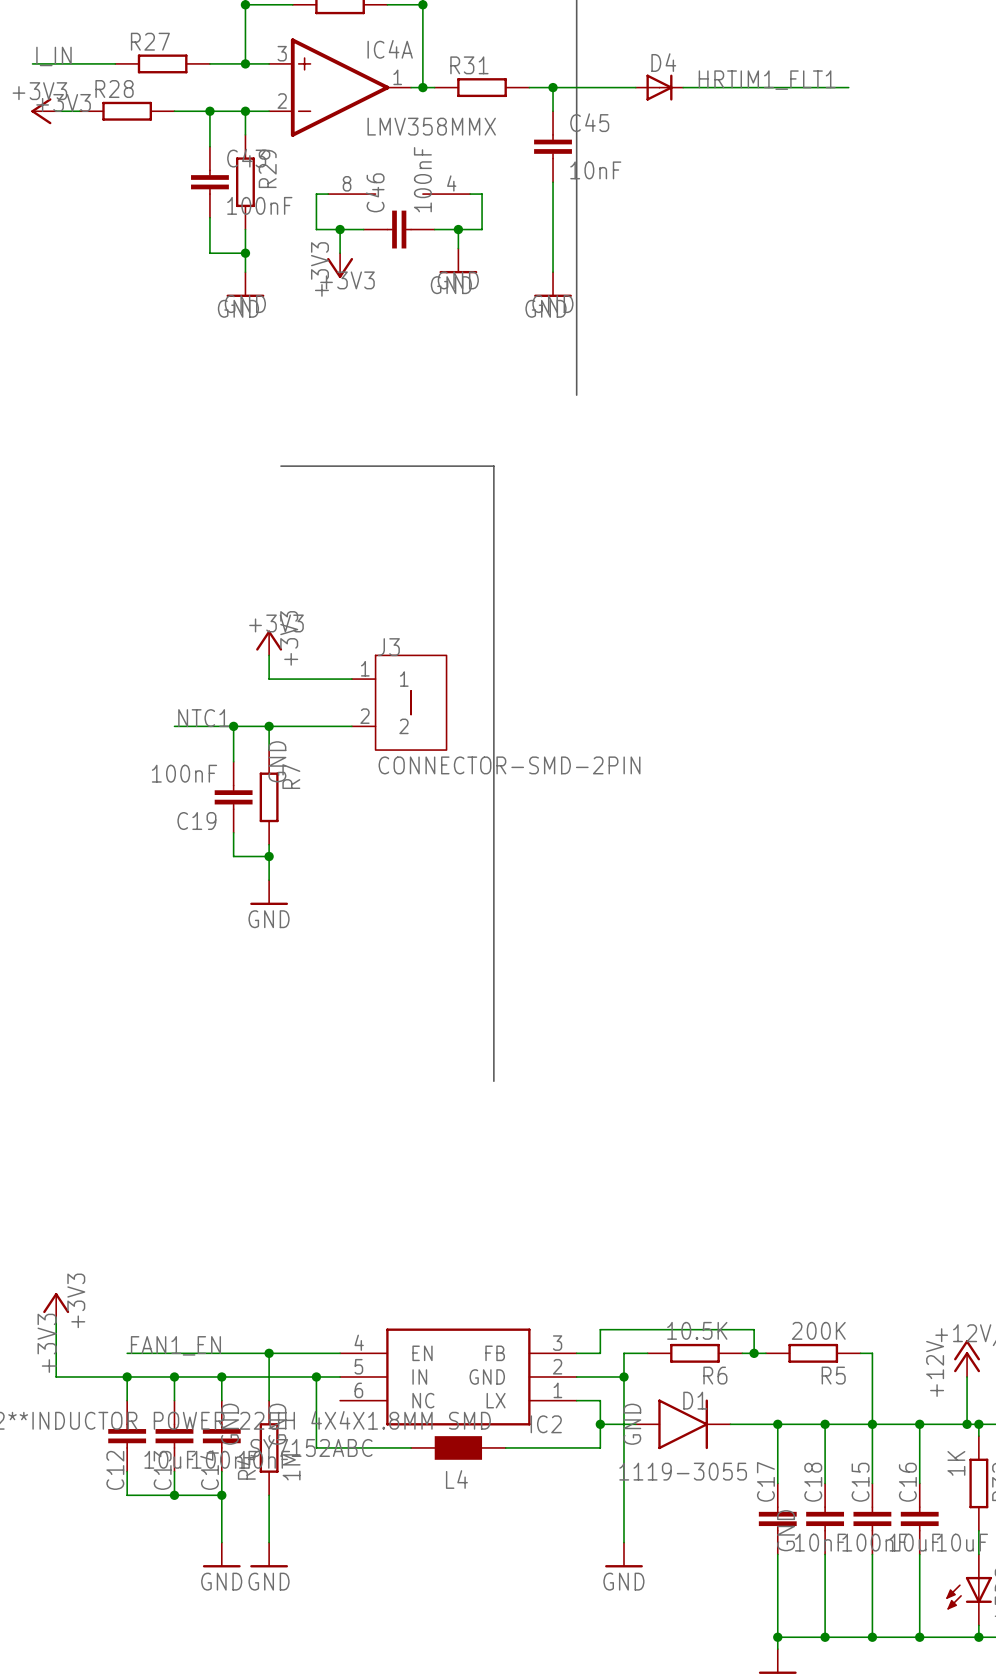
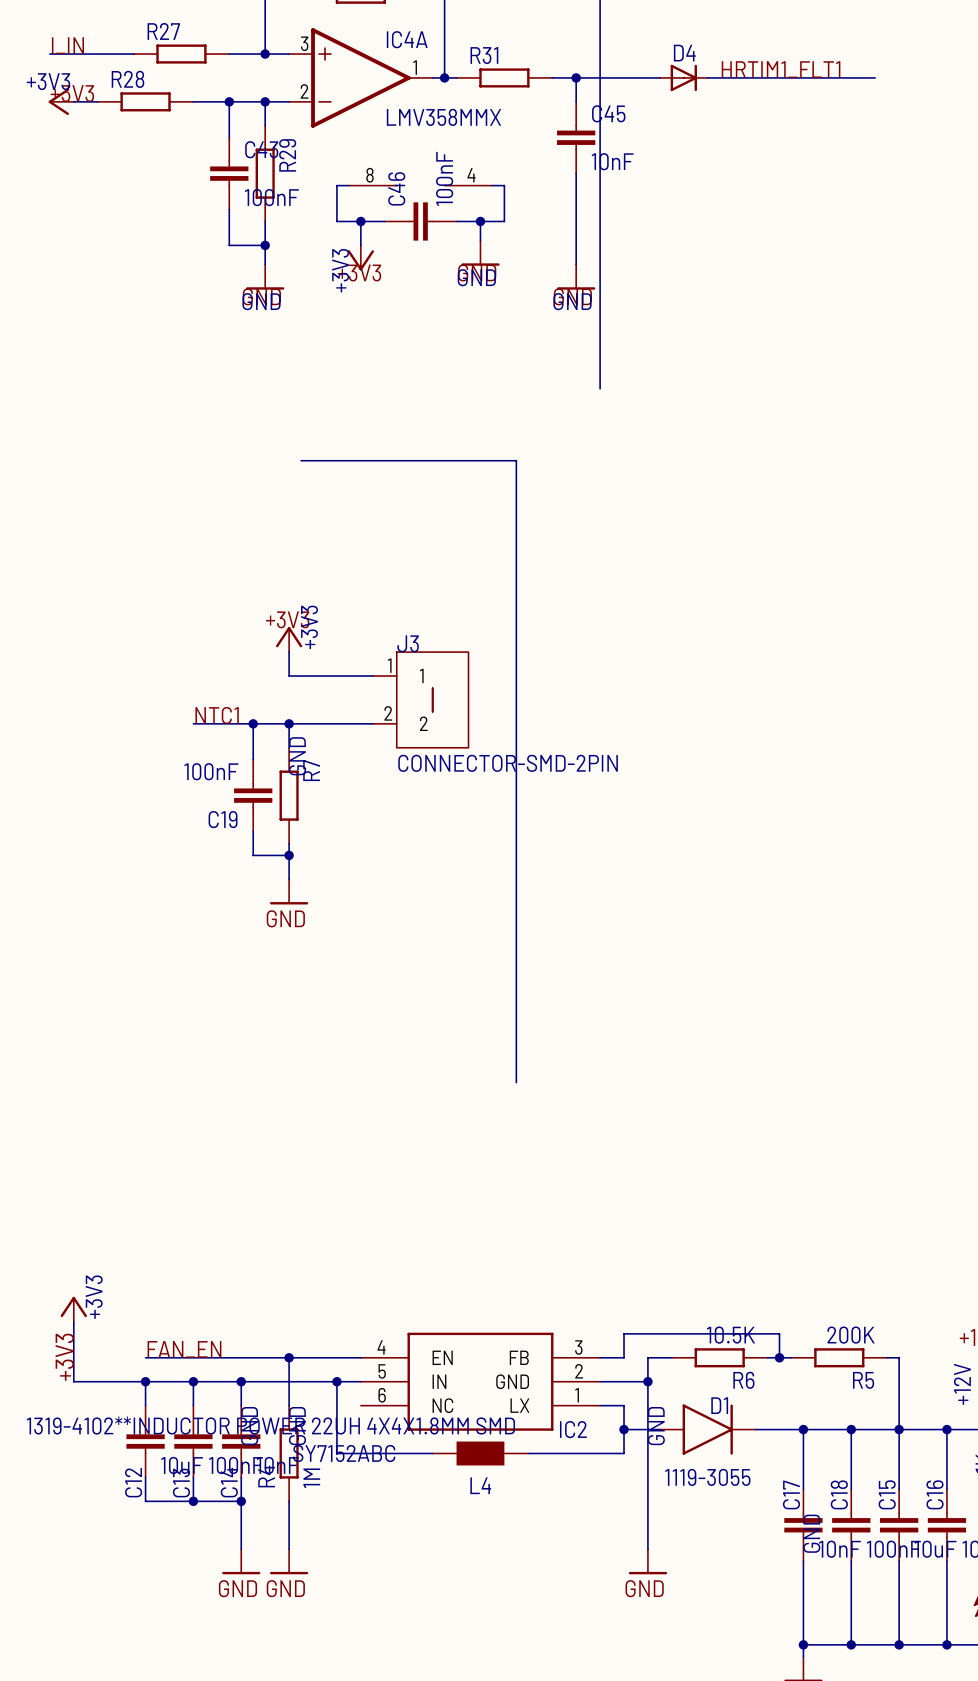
label: FAN1_EN (175, 1345) -> FAN_EN (184, 1349)

